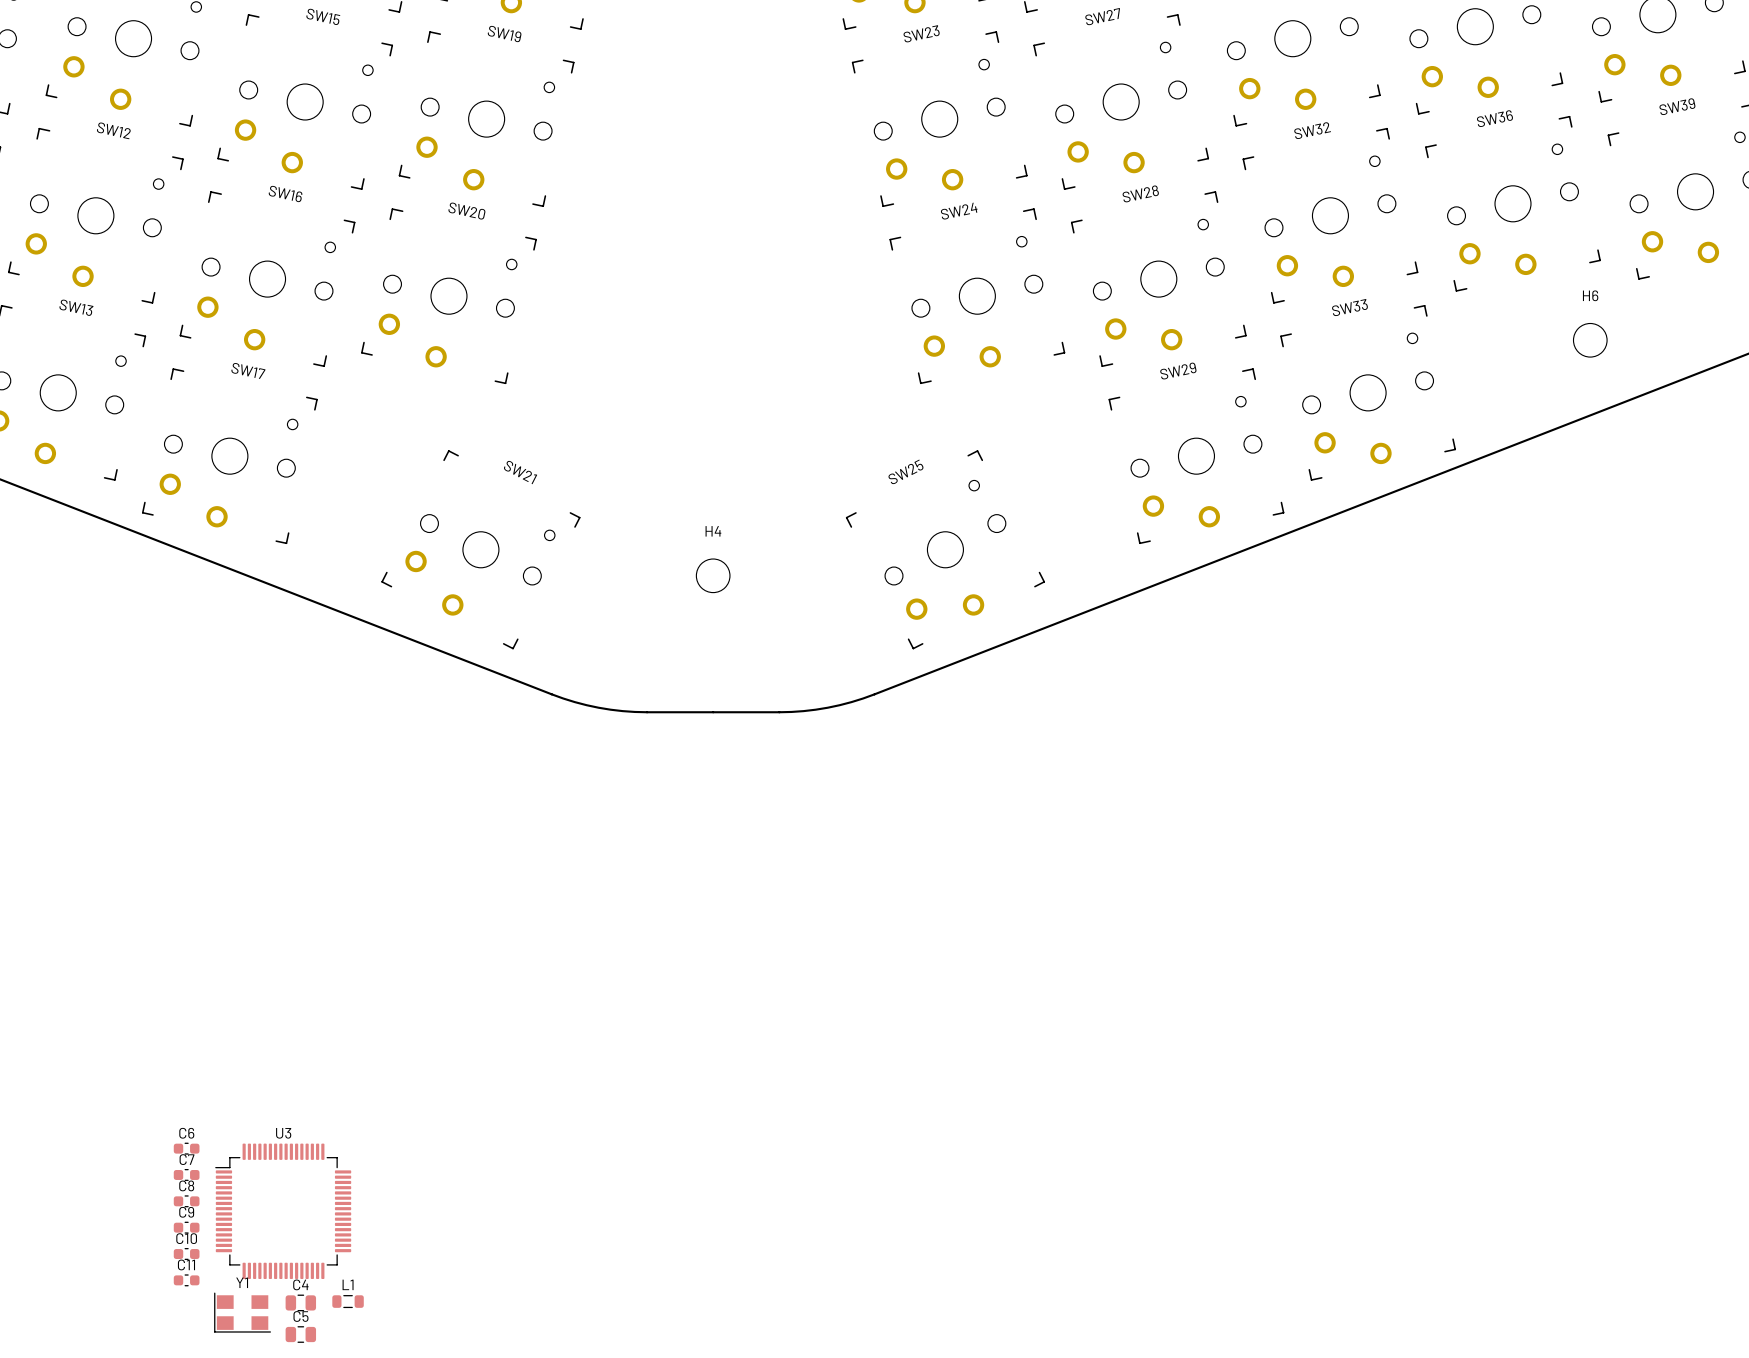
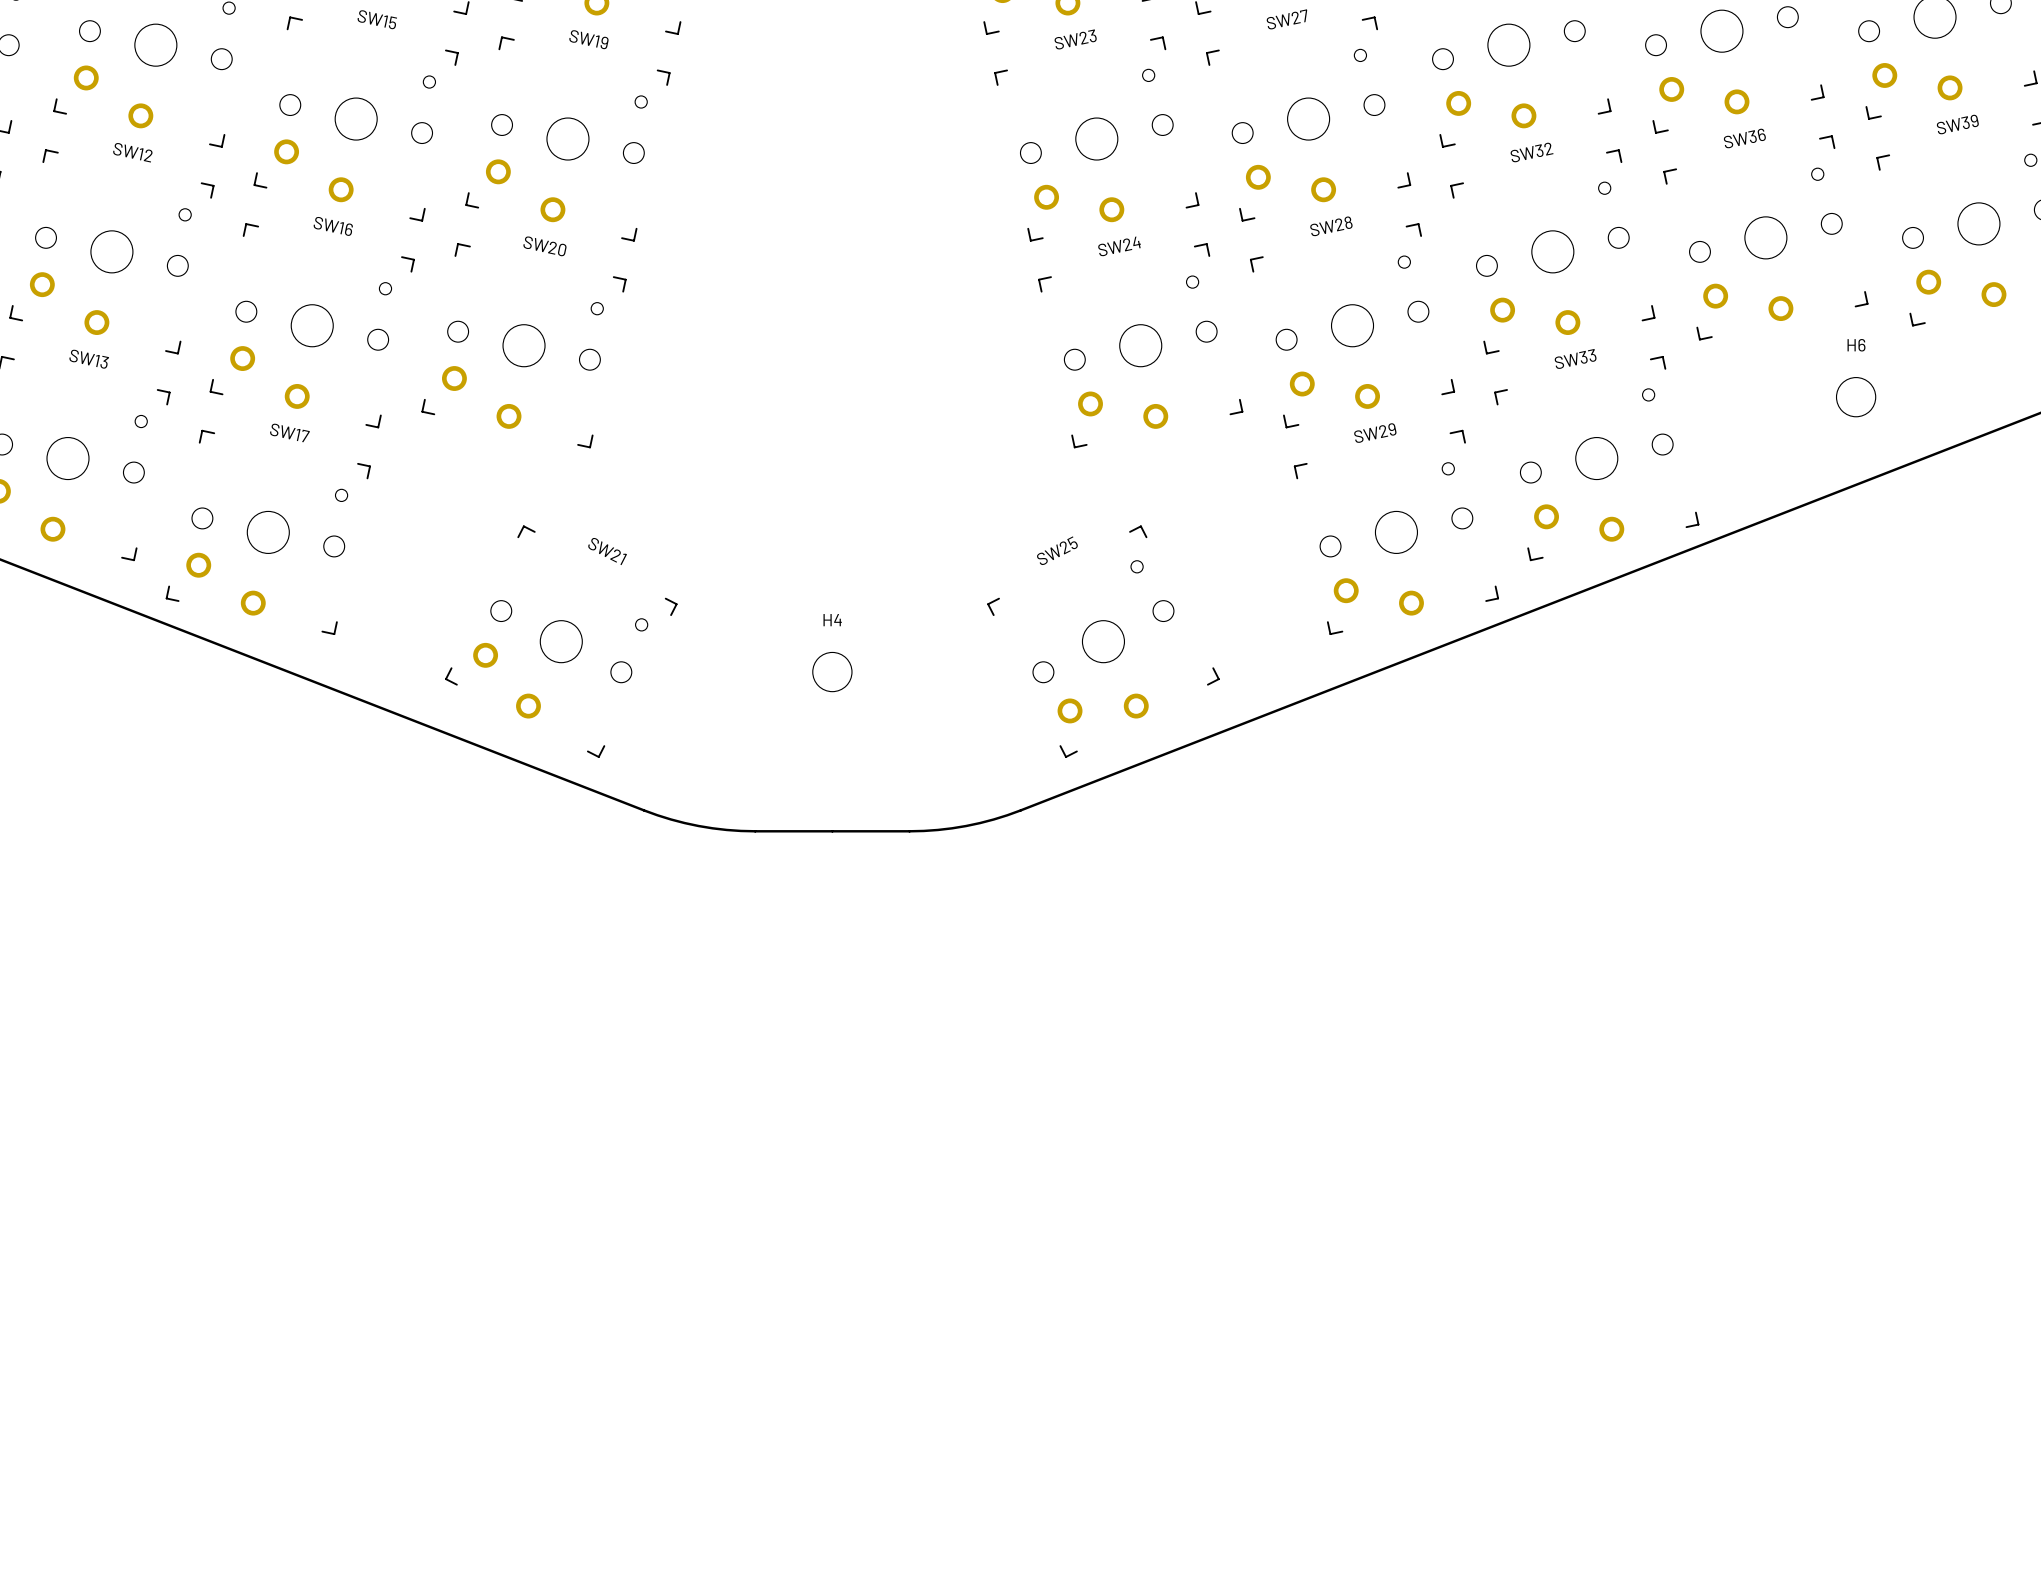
C6: (186, 1148) -> none
C7: (186, 1174) -> none
C8: (186, 1201) -> none
U3: (283, 1211) -> none
C9: (186, 1227) -> none
C10: (186, 1254) -> none
C11: (186, 1280) -> none
L1: (348, 1301) -> none
C4: (300, 1302) -> none
Y1: (242, 1312) -> none
C5: (300, 1334) -> none

